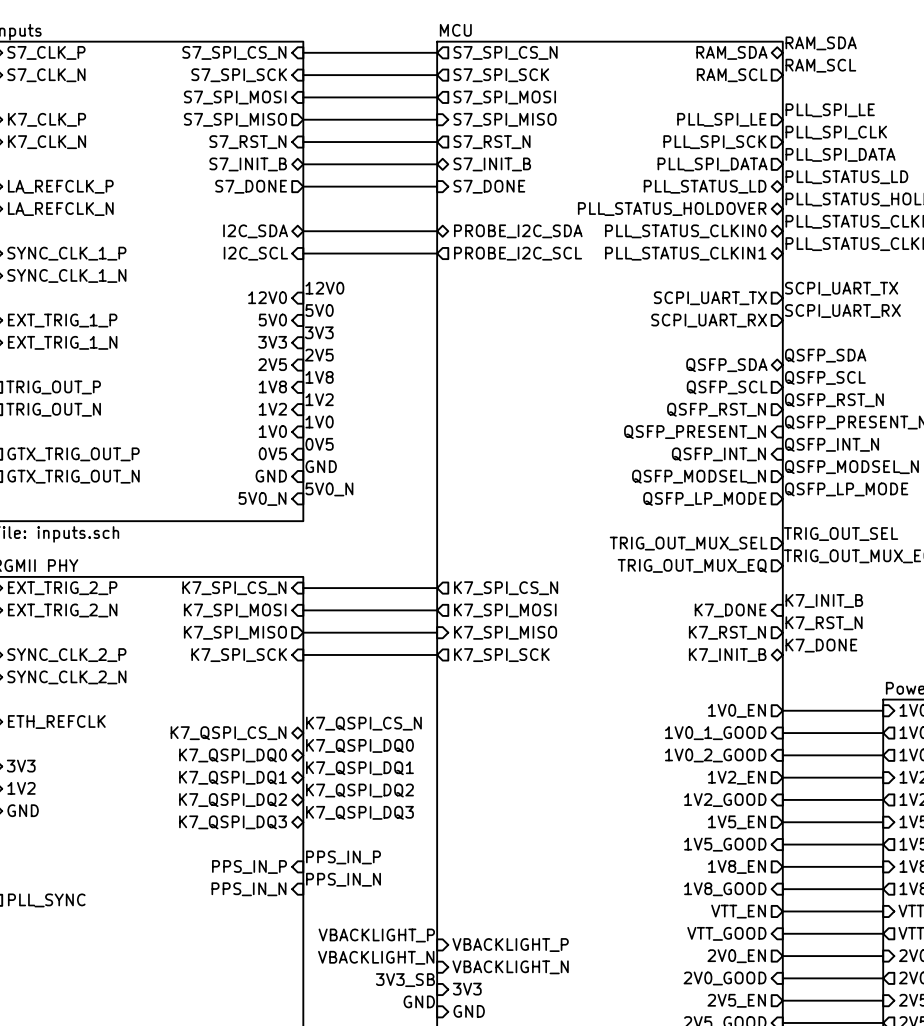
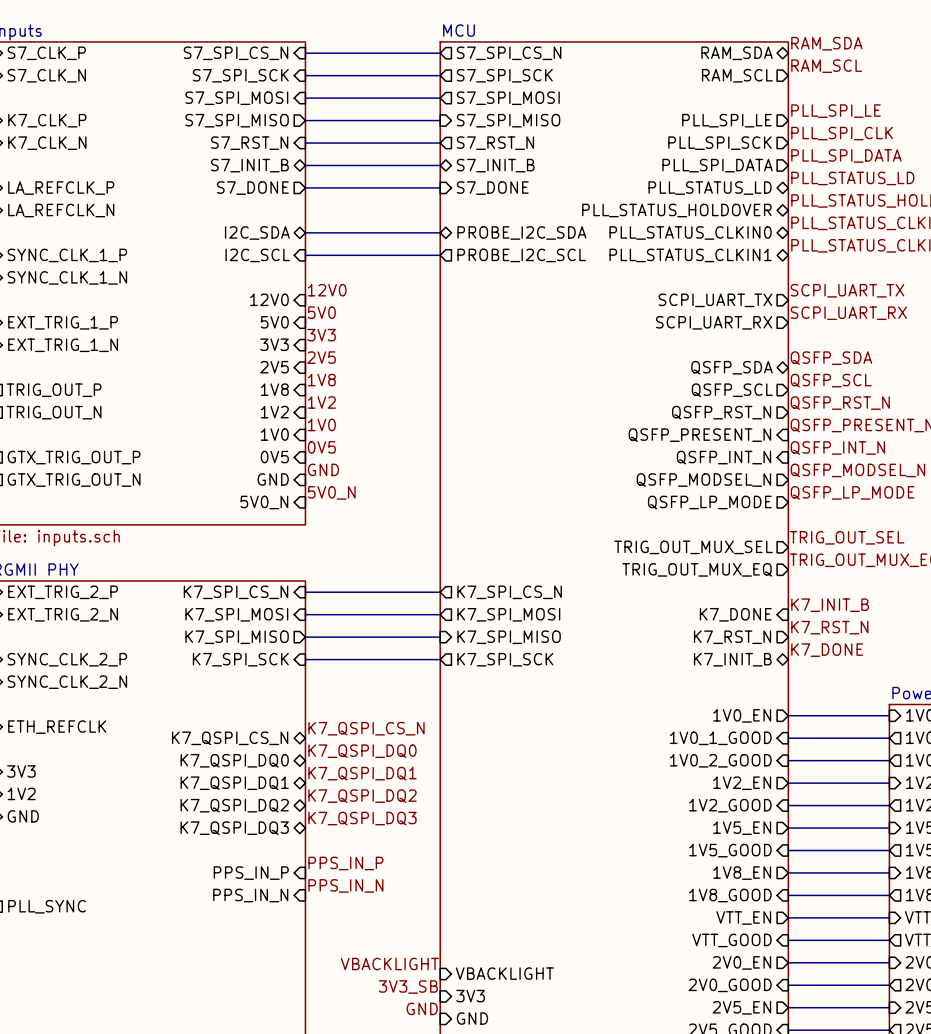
label: VBACKLIGHT_P (376, 935) -> none
sheet pin: VBACKLIGHT_P (510, 945) -> none
label: VBACKLIGHT_N (376, 957) -> VBACKLIGHT (389, 964)
sheet pin: VBACKLIGHT_N (510, 967) -> VBACKLIGHT (504, 973)

